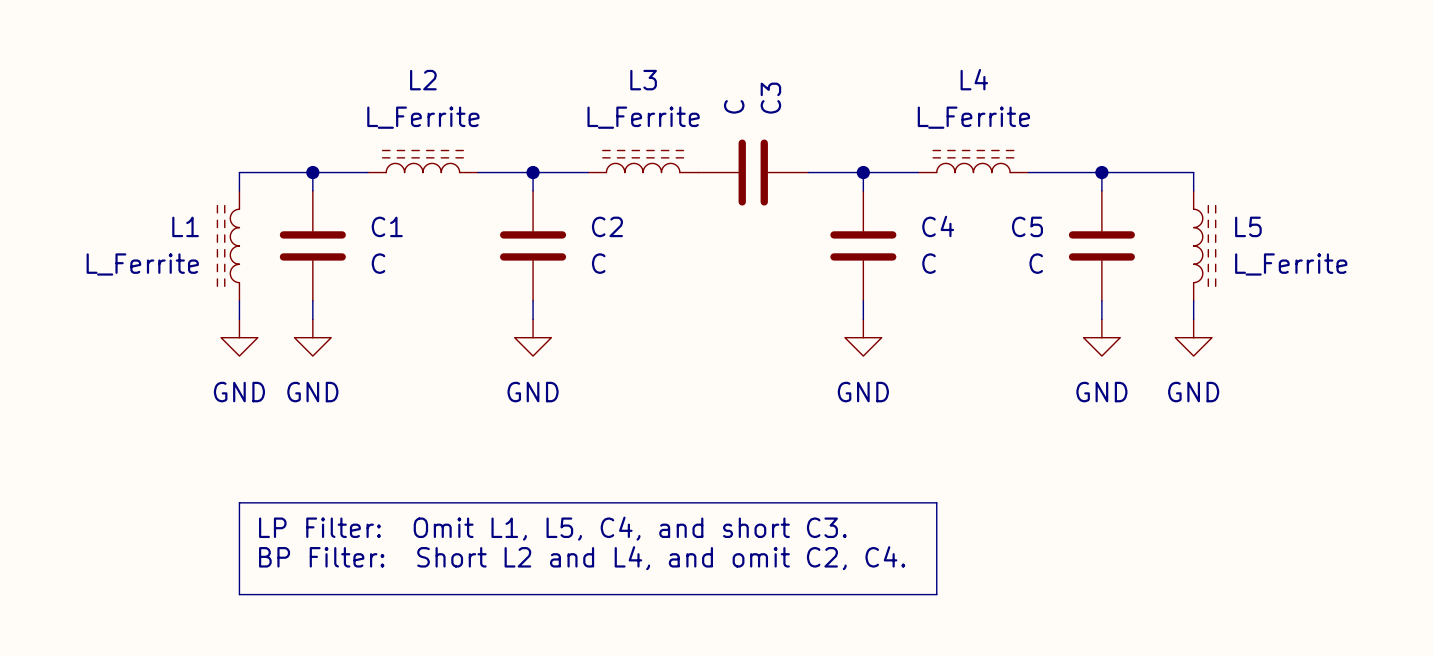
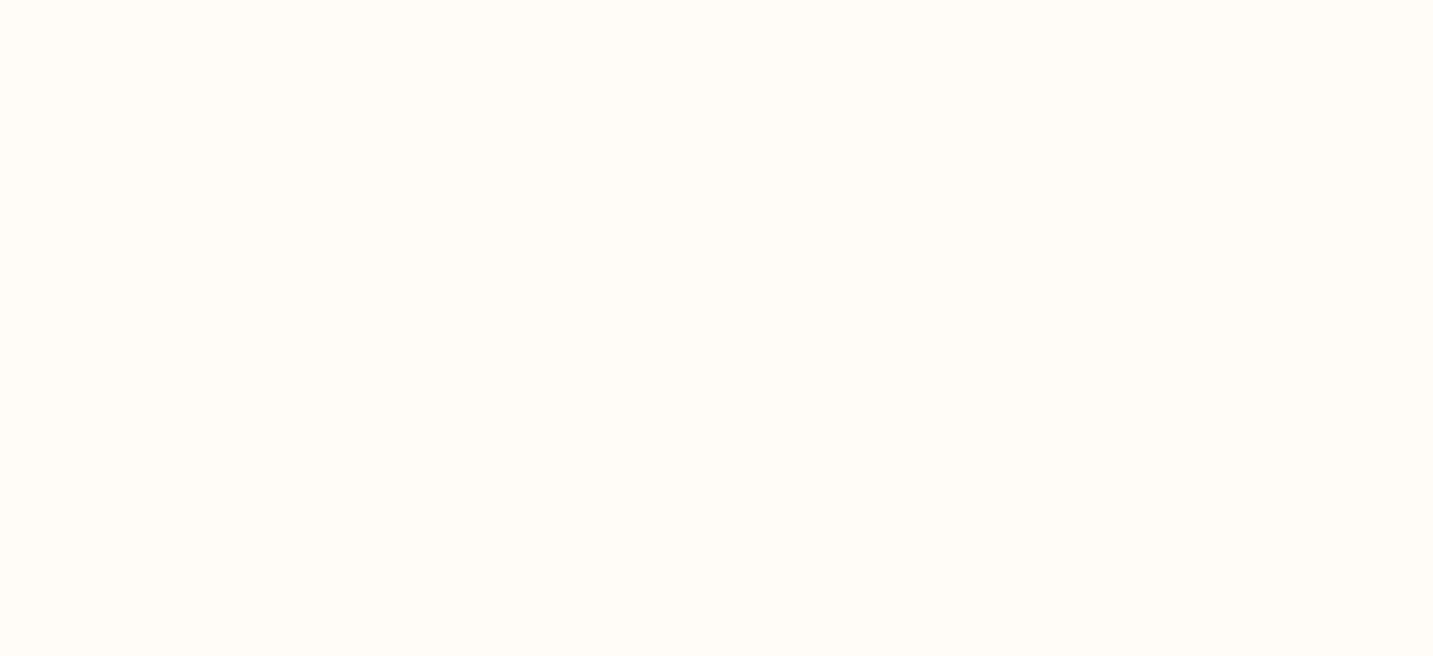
L2: L_Ferrite (422, 161) -> none
L3: L_Ferrite (643, 161) -> none
L4: L_Ferrite (973, 161) -> none
wire: (312, 172) (312, 190) -> none
junction: (312, 172) -> none
wire: (367, 172) (239, 172) (239, 190) -> none
wire: (477, 172) (588, 172) -> none
wire: (533, 172) (533, 190) -> none
junction: (533, 172) -> none
C3: C (753, 172) -> none
wire: (808, 172) (918, 172) -> none
wire: (863, 172) (863, 190) -> none
junction: (863, 172) -> none
wire: (1028, 172) (1193, 172) (1193, 190) -> none
wire: (1101, 172) (1101, 190) -> none
junction: (1101, 172) -> none
L1: L_Ferrite (228, 245) -> none
C1: C (312, 245) -> none
C2: C (533, 245) -> none
C4: C (863, 245) -> none
C5: C (1101, 245) -> none
L5: L_Ferrite (1204, 245) -> none
wire: (239, 300) (239, 319) -> none
wire: (312, 300) (312, 319) -> none
wire: (533, 300) (533, 319) -> none
wire: (863, 300) (863, 319) -> none
wire: (1101, 300) (1101, 319) -> none
wire: (1193, 300) (1193, 319) -> none
power symbol: GND (239, 337) -> none
power symbol: GND (312, 337) -> none
power symbol: GND (533, 337) -> none
power symbol: GND (863, 337) -> none
power symbol: GND (1101, 337) -> none
power symbol: GND (1193, 337) -> none
line: (239, 502) (936, 502) (936, 594) (239, 594) (239, 502) -> none
text: LP Filter: Omit L1, L5, C4, and short C3. (552, 528) -> none
text: BP Filter: Short L2 and L4, and omit C2, C4. (582, 558) -> none

